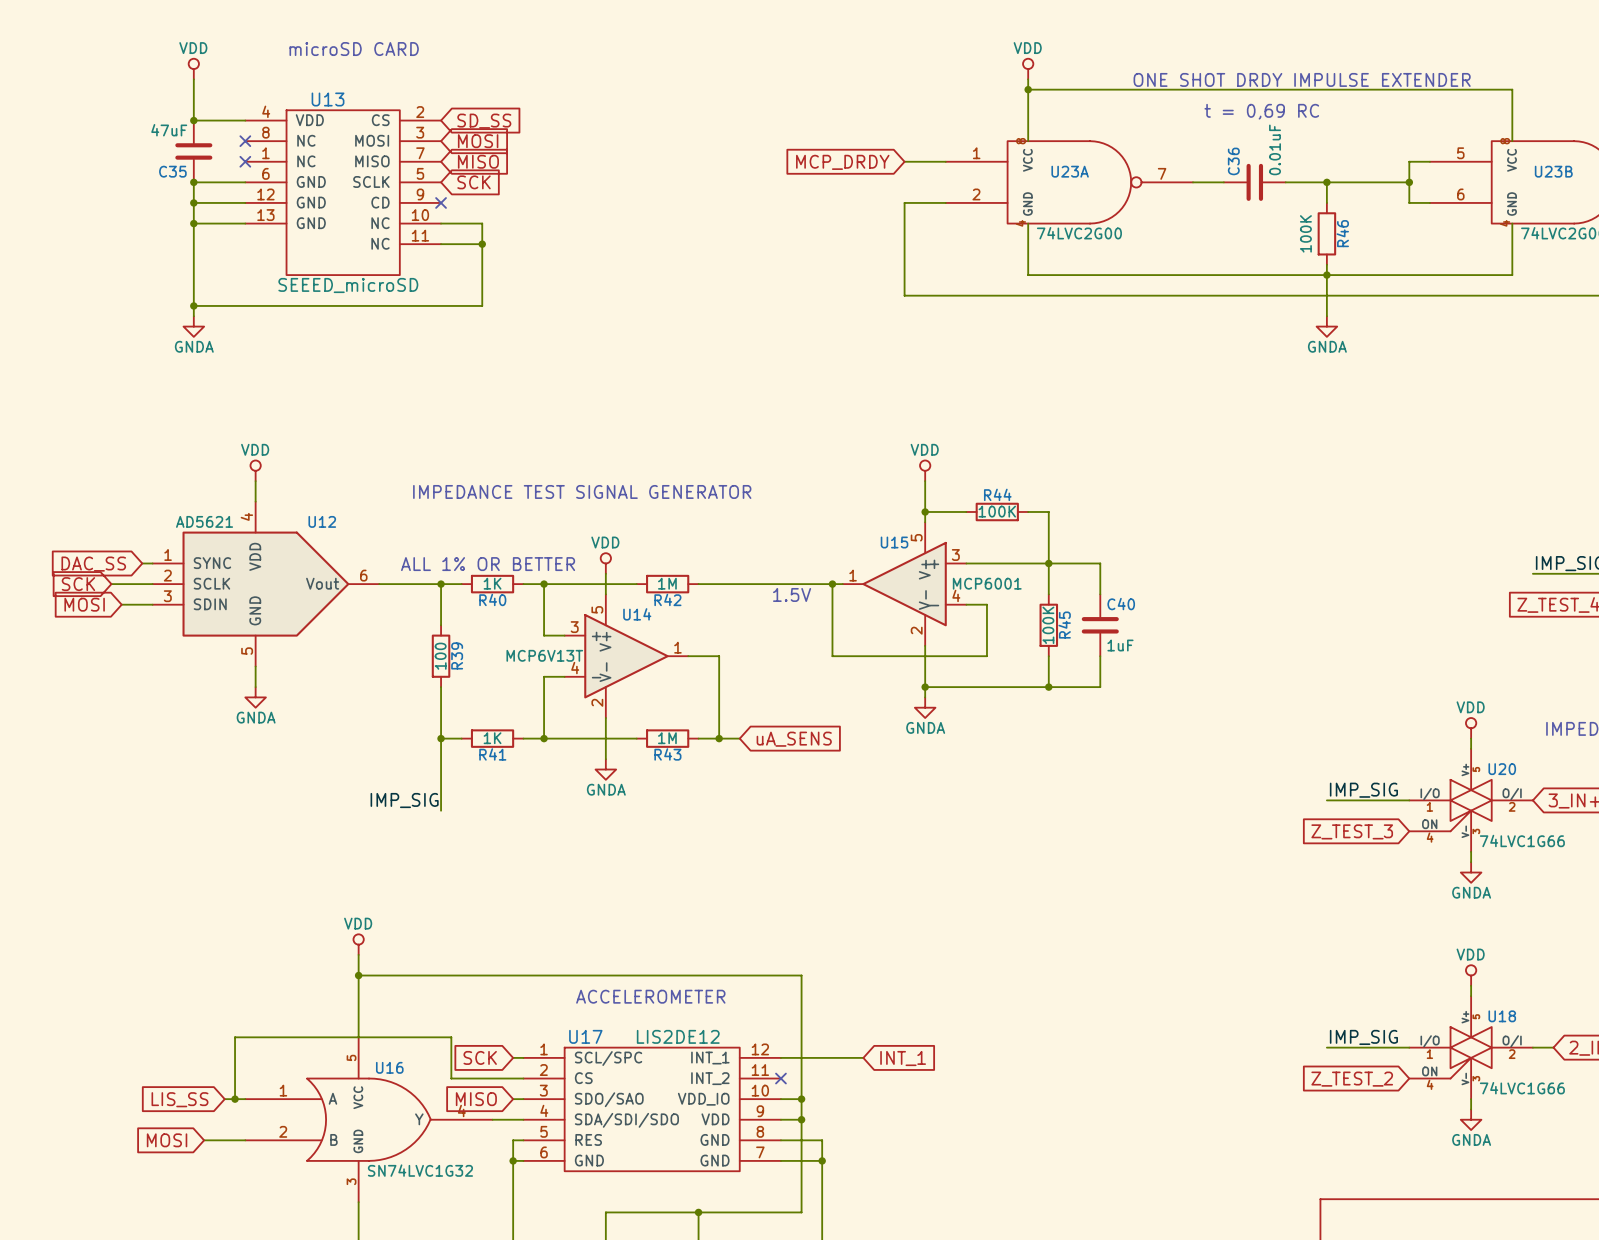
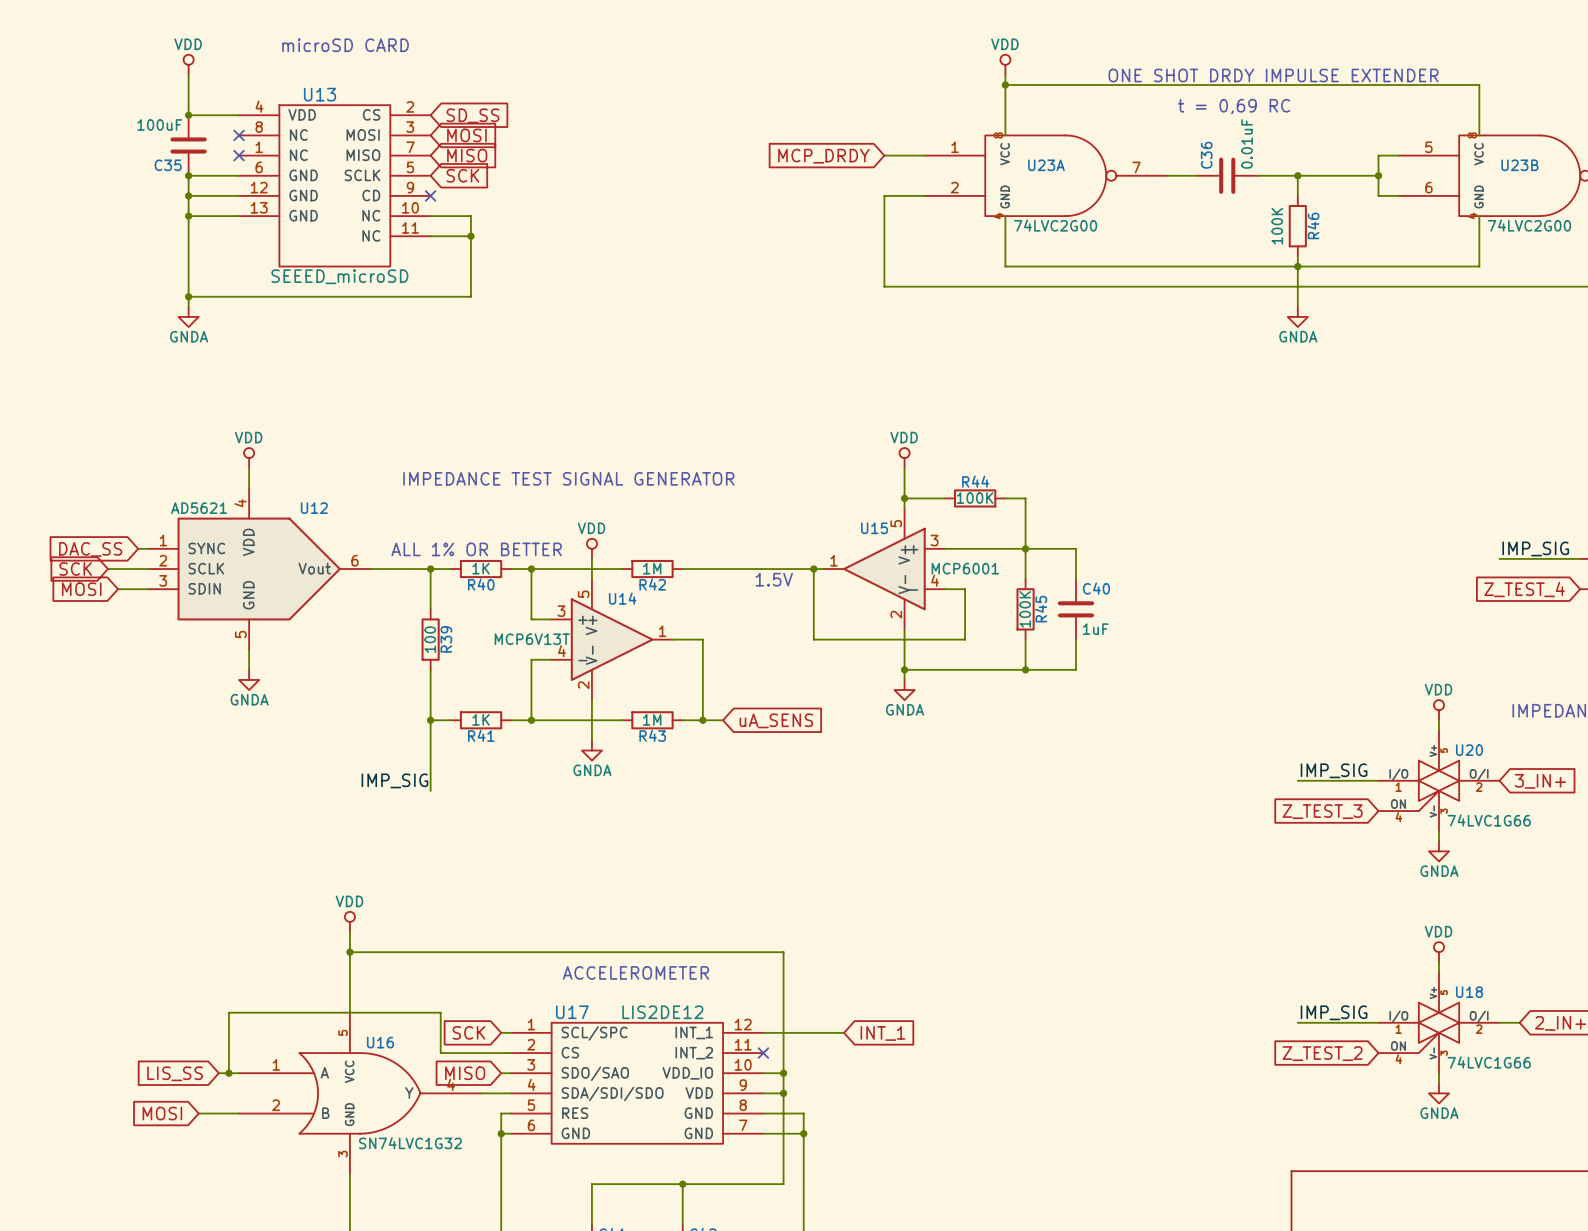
C35 value: 47uF (169, 130) -> 100uF (159, 124)

